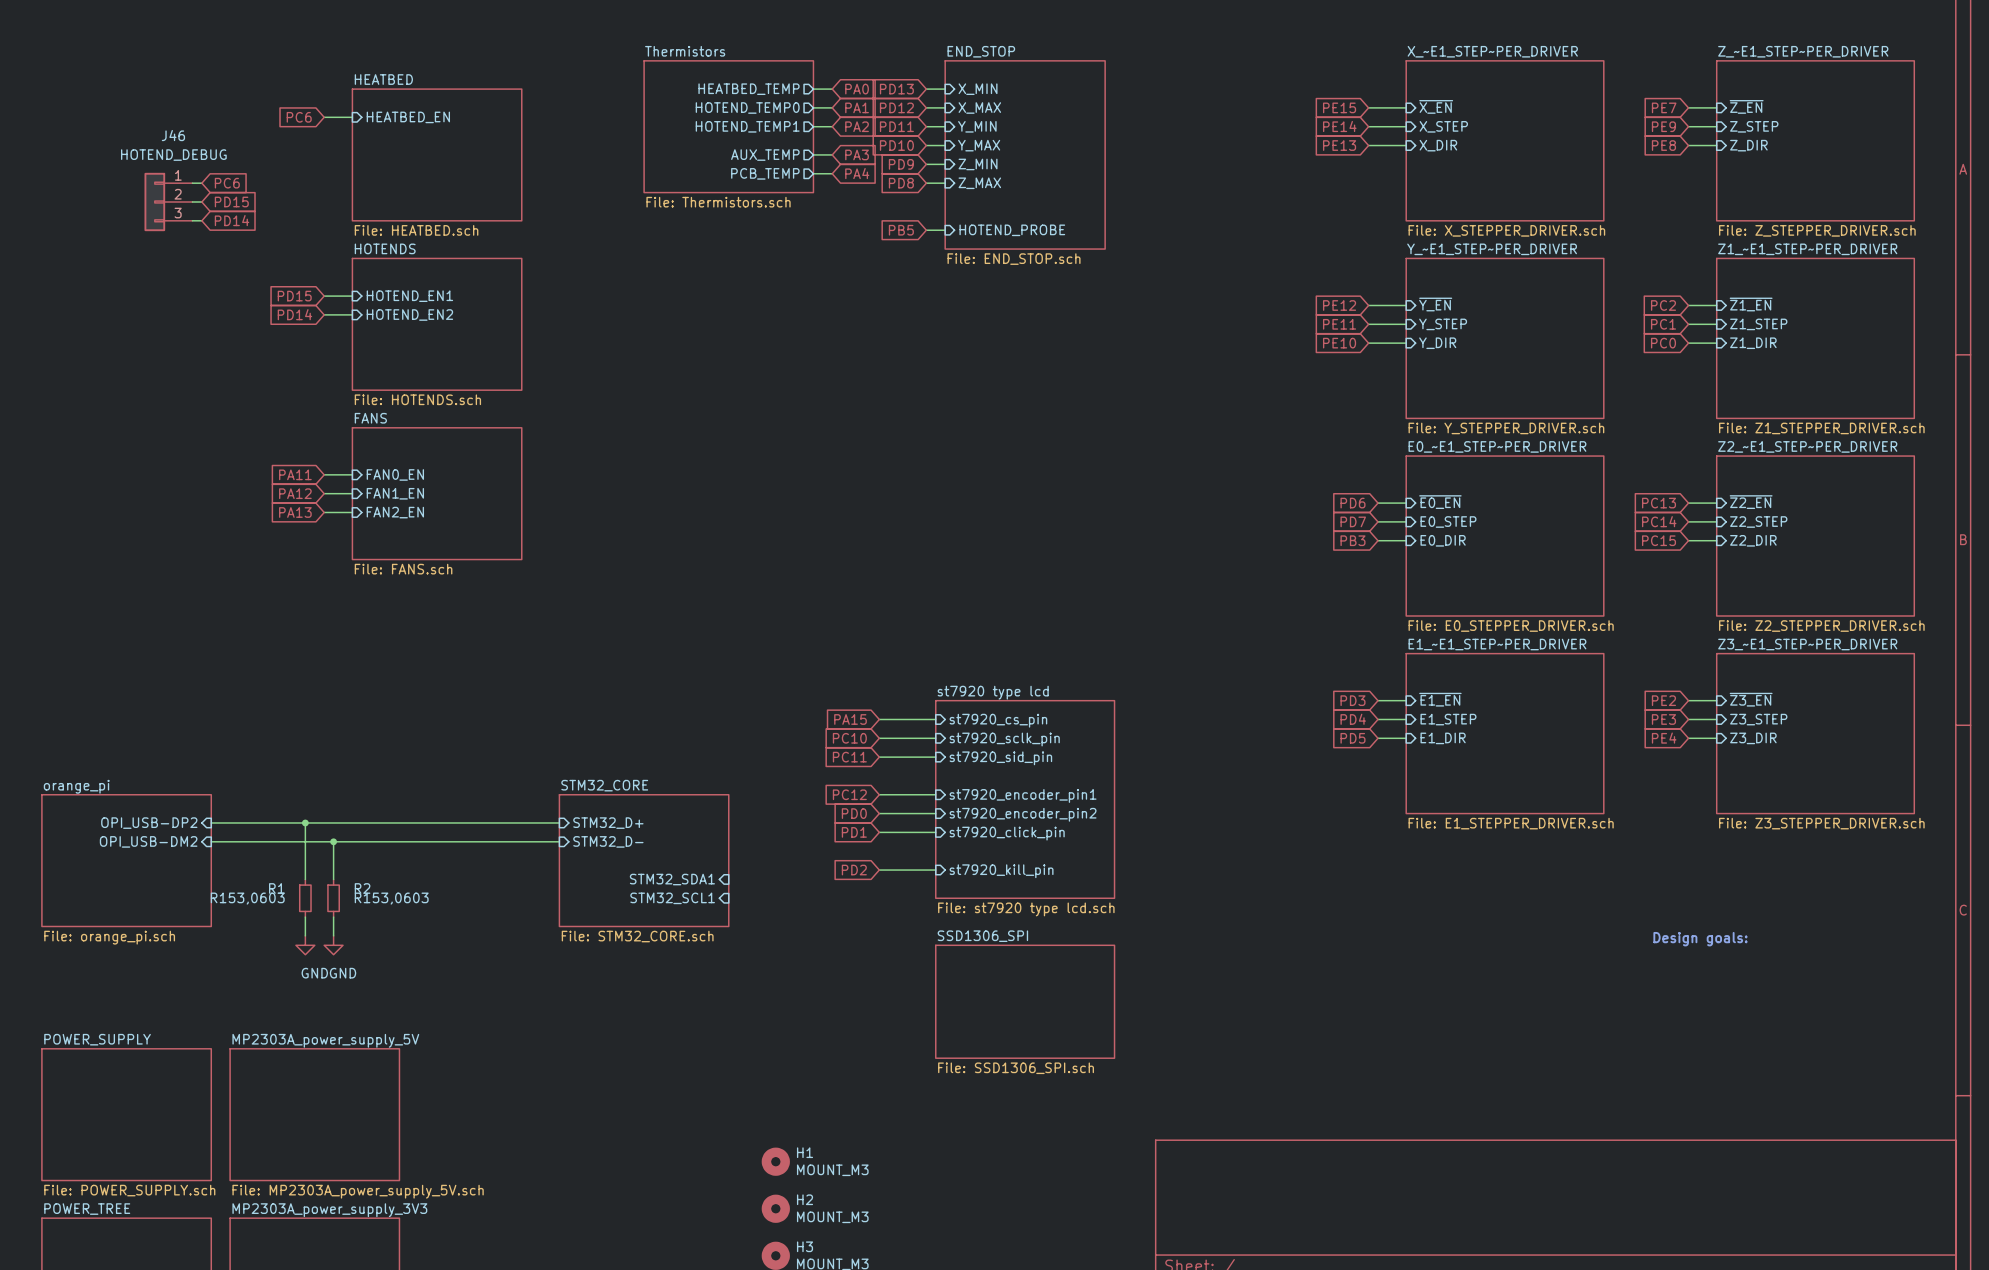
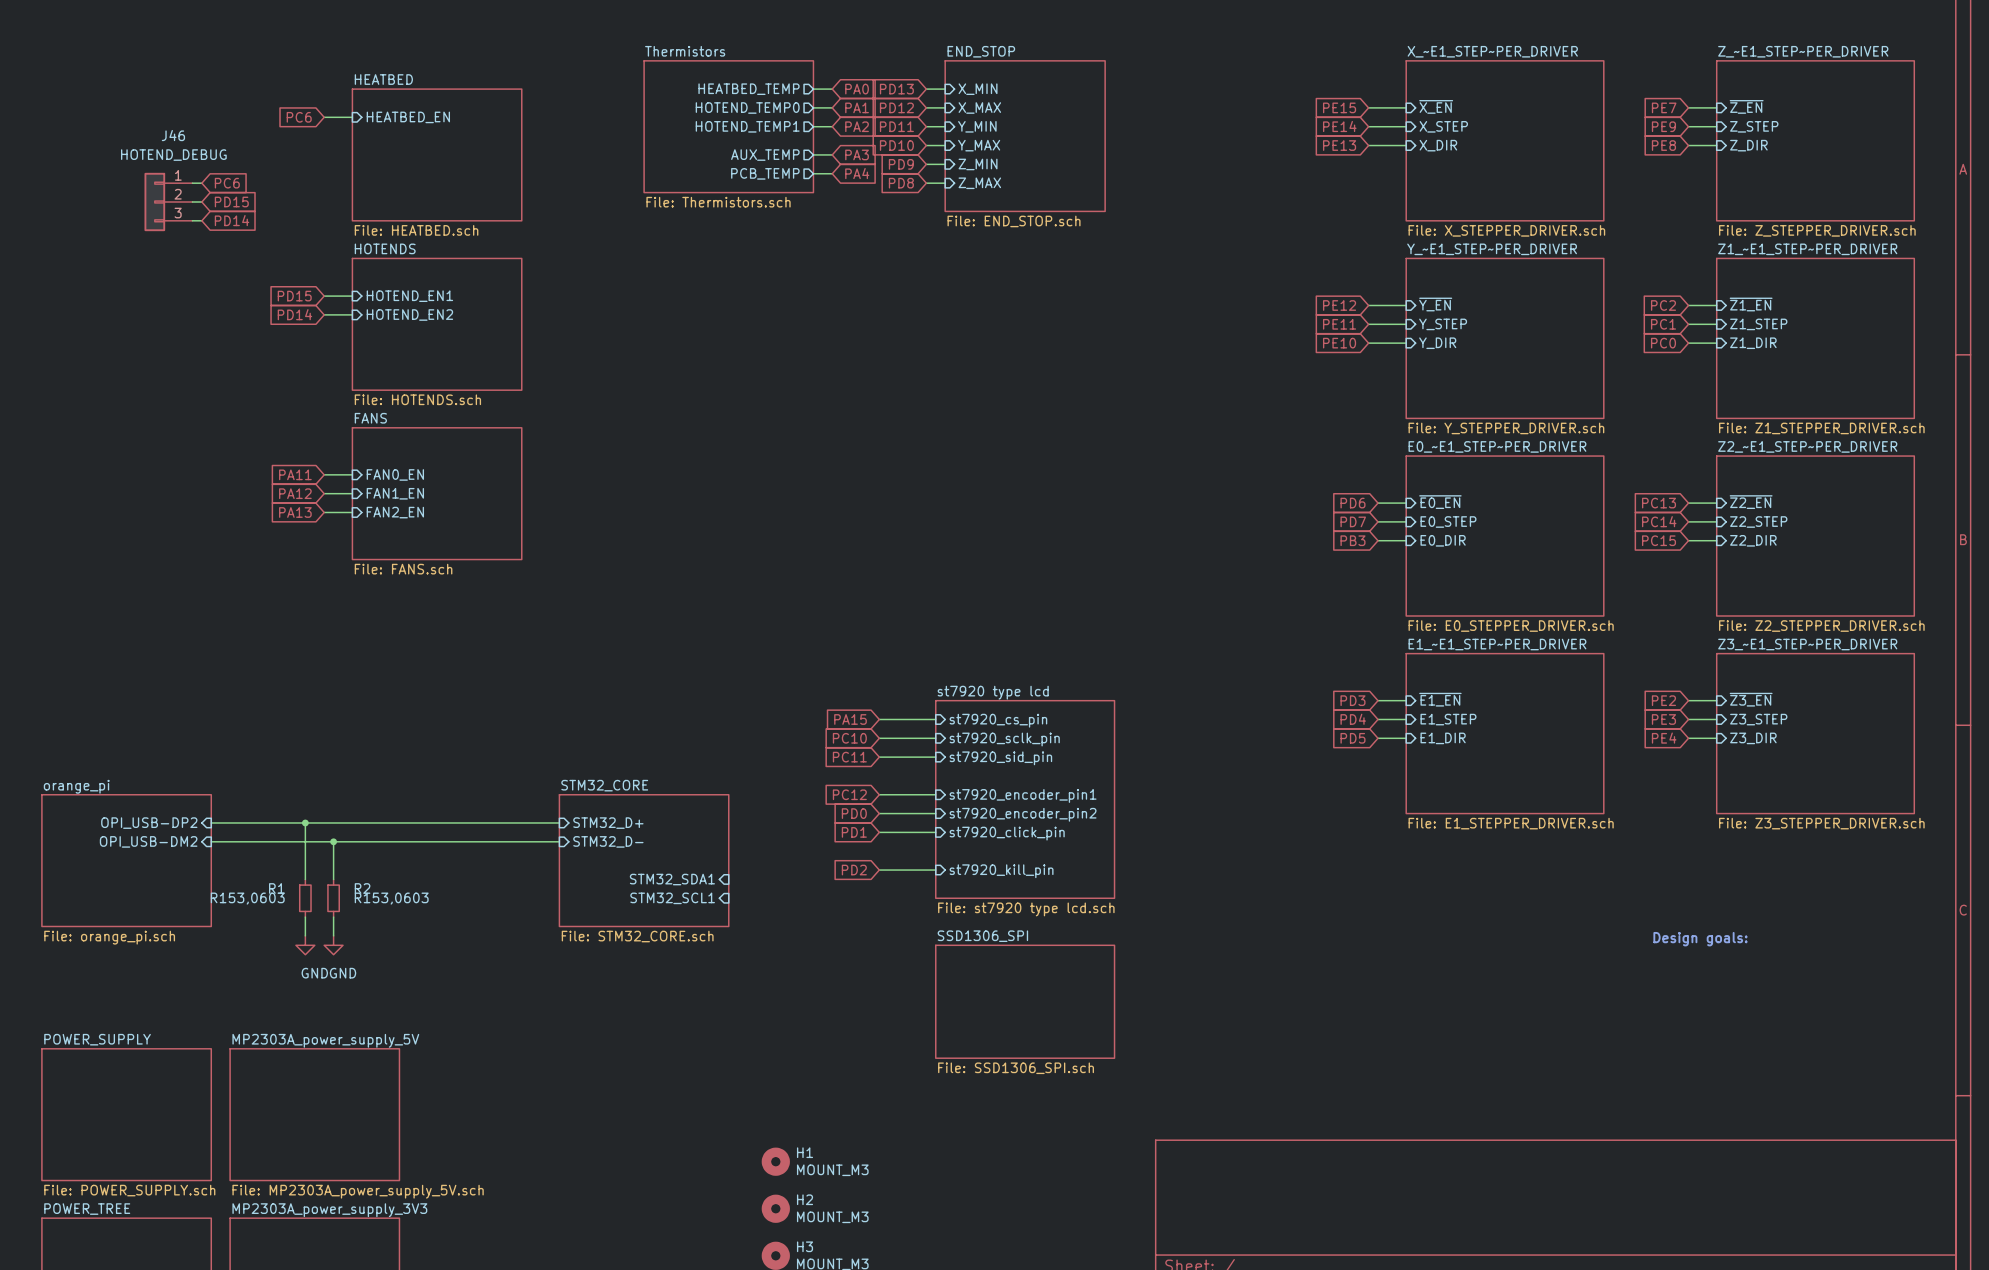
sheet END_STOP: none -> File: END_STOP.sch (1025, 136)
sheet END_STOP: File: END_STOP.sch (1025, 154) -> none
global label: PB5 (901, 230) -> none
wire: (926, 230) (945, 230) -> none
sheet pin: HOTEND_PROBE (1012, 230) -> none

